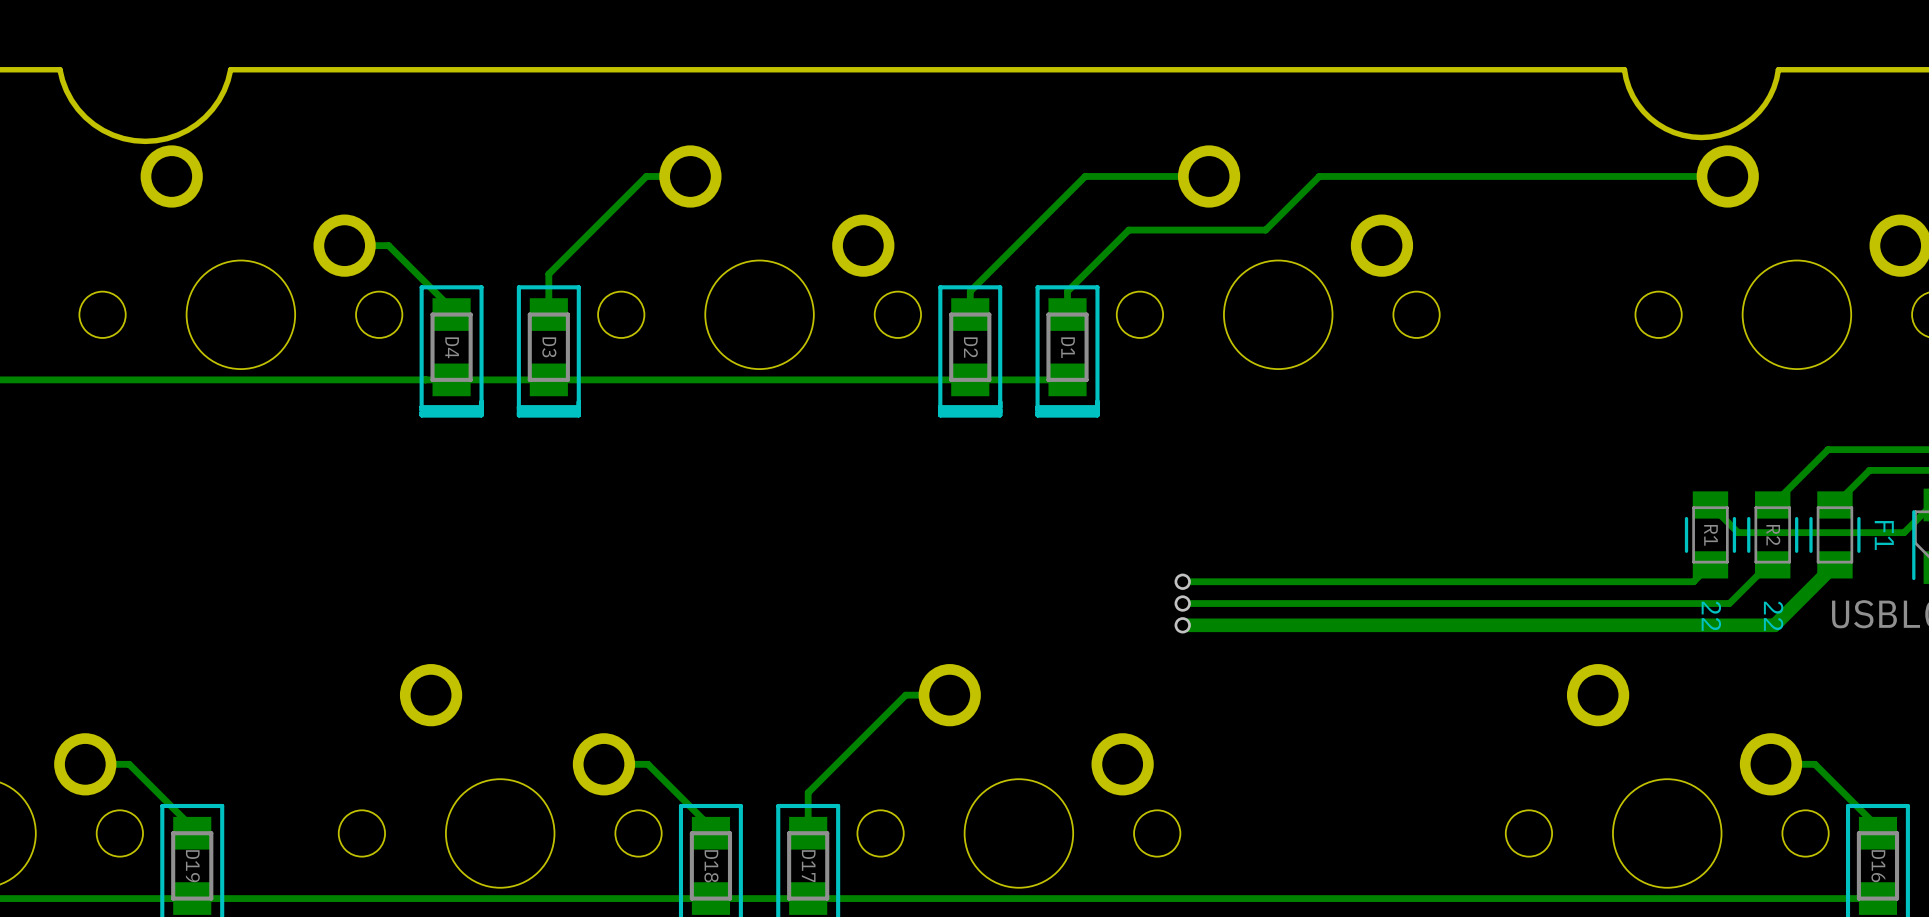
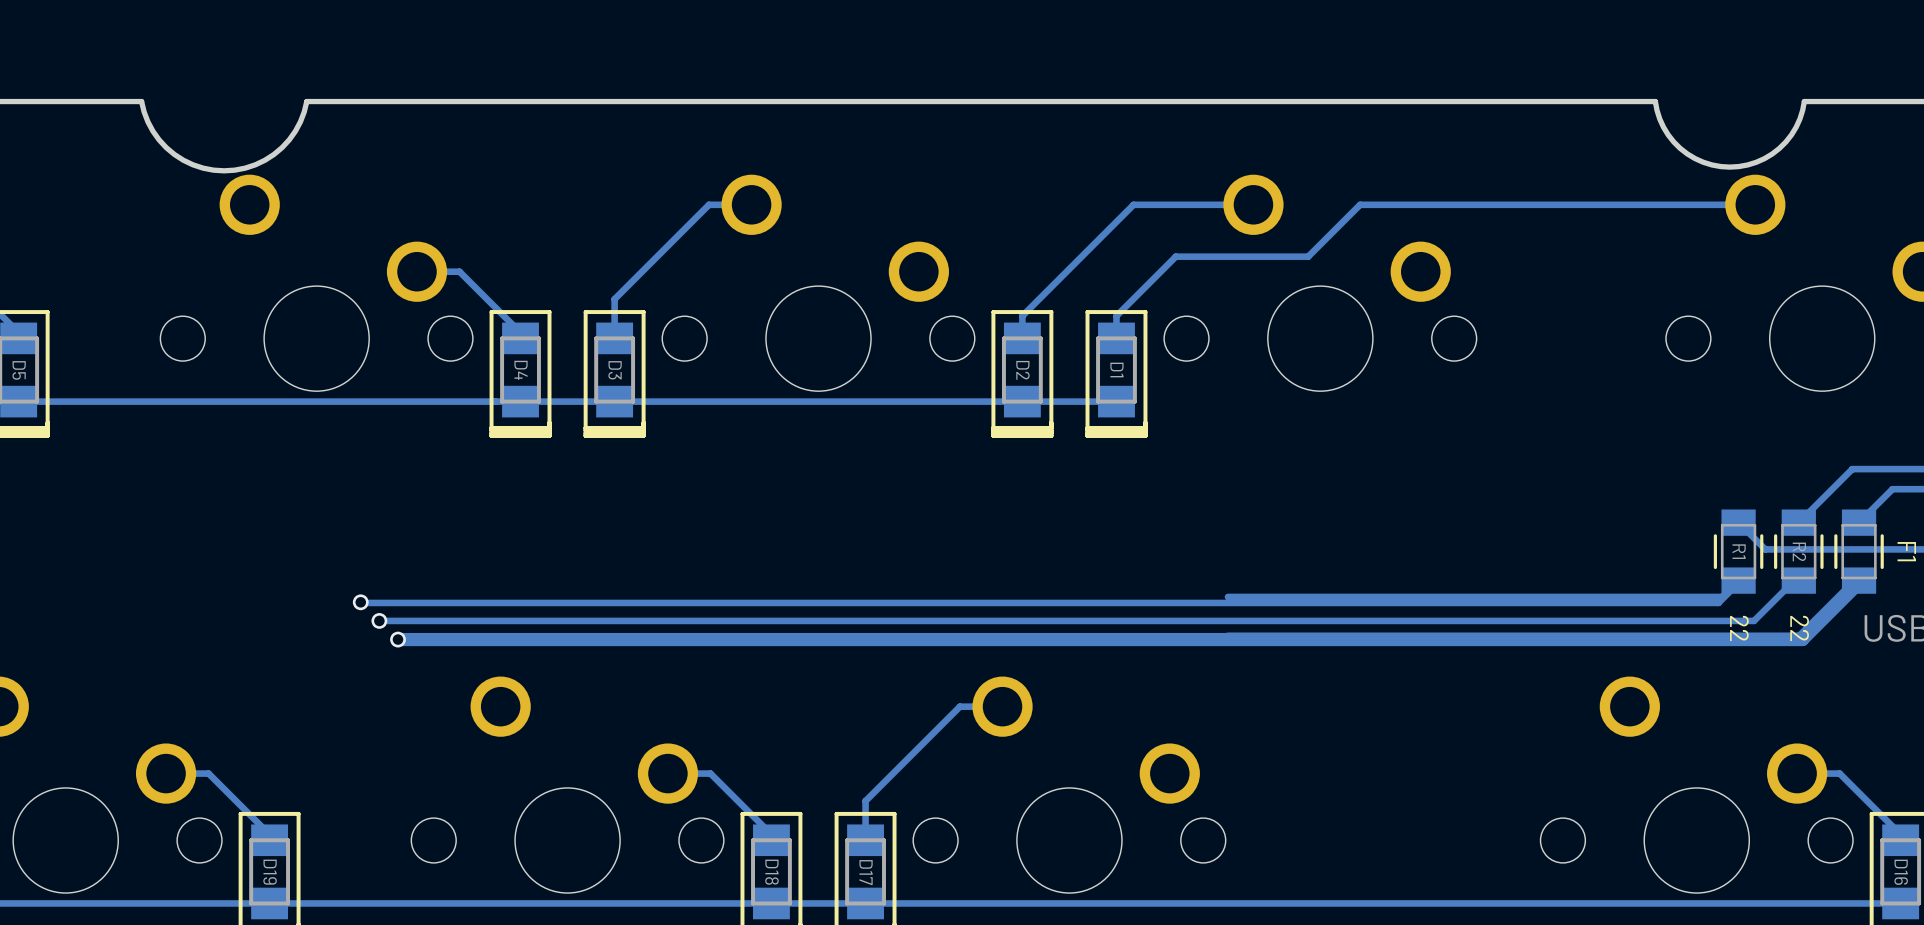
track: none -> (1738, 582) (1718, 602) (360, 602)
track: none -> (1859, 582) (1802, 639) (398, 639)
via: (1182, 581) -> none
via: none -> (360, 602)
via: (1182, 603) -> none
track: (1729, 603) (1182, 603) -> (1756, 618) (1754, 620) (379, 620)
via: none -> (379, 620)
via: none -> (398, 639)
via: (1182, 625) -> none

